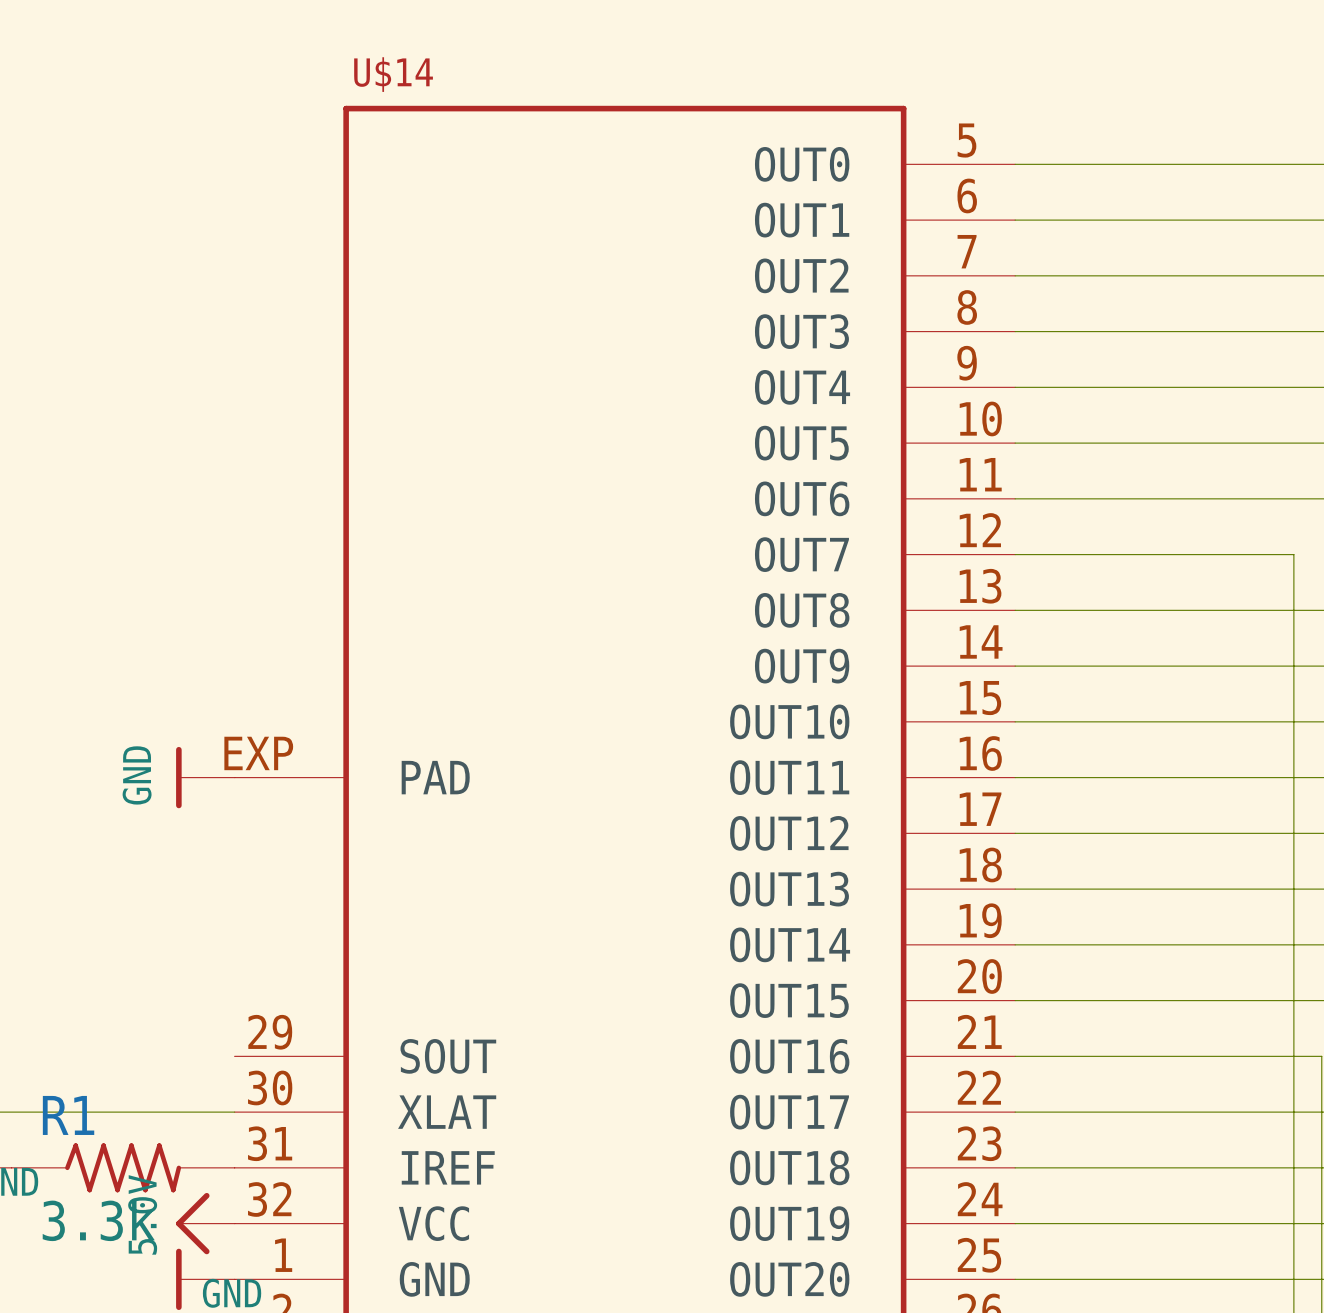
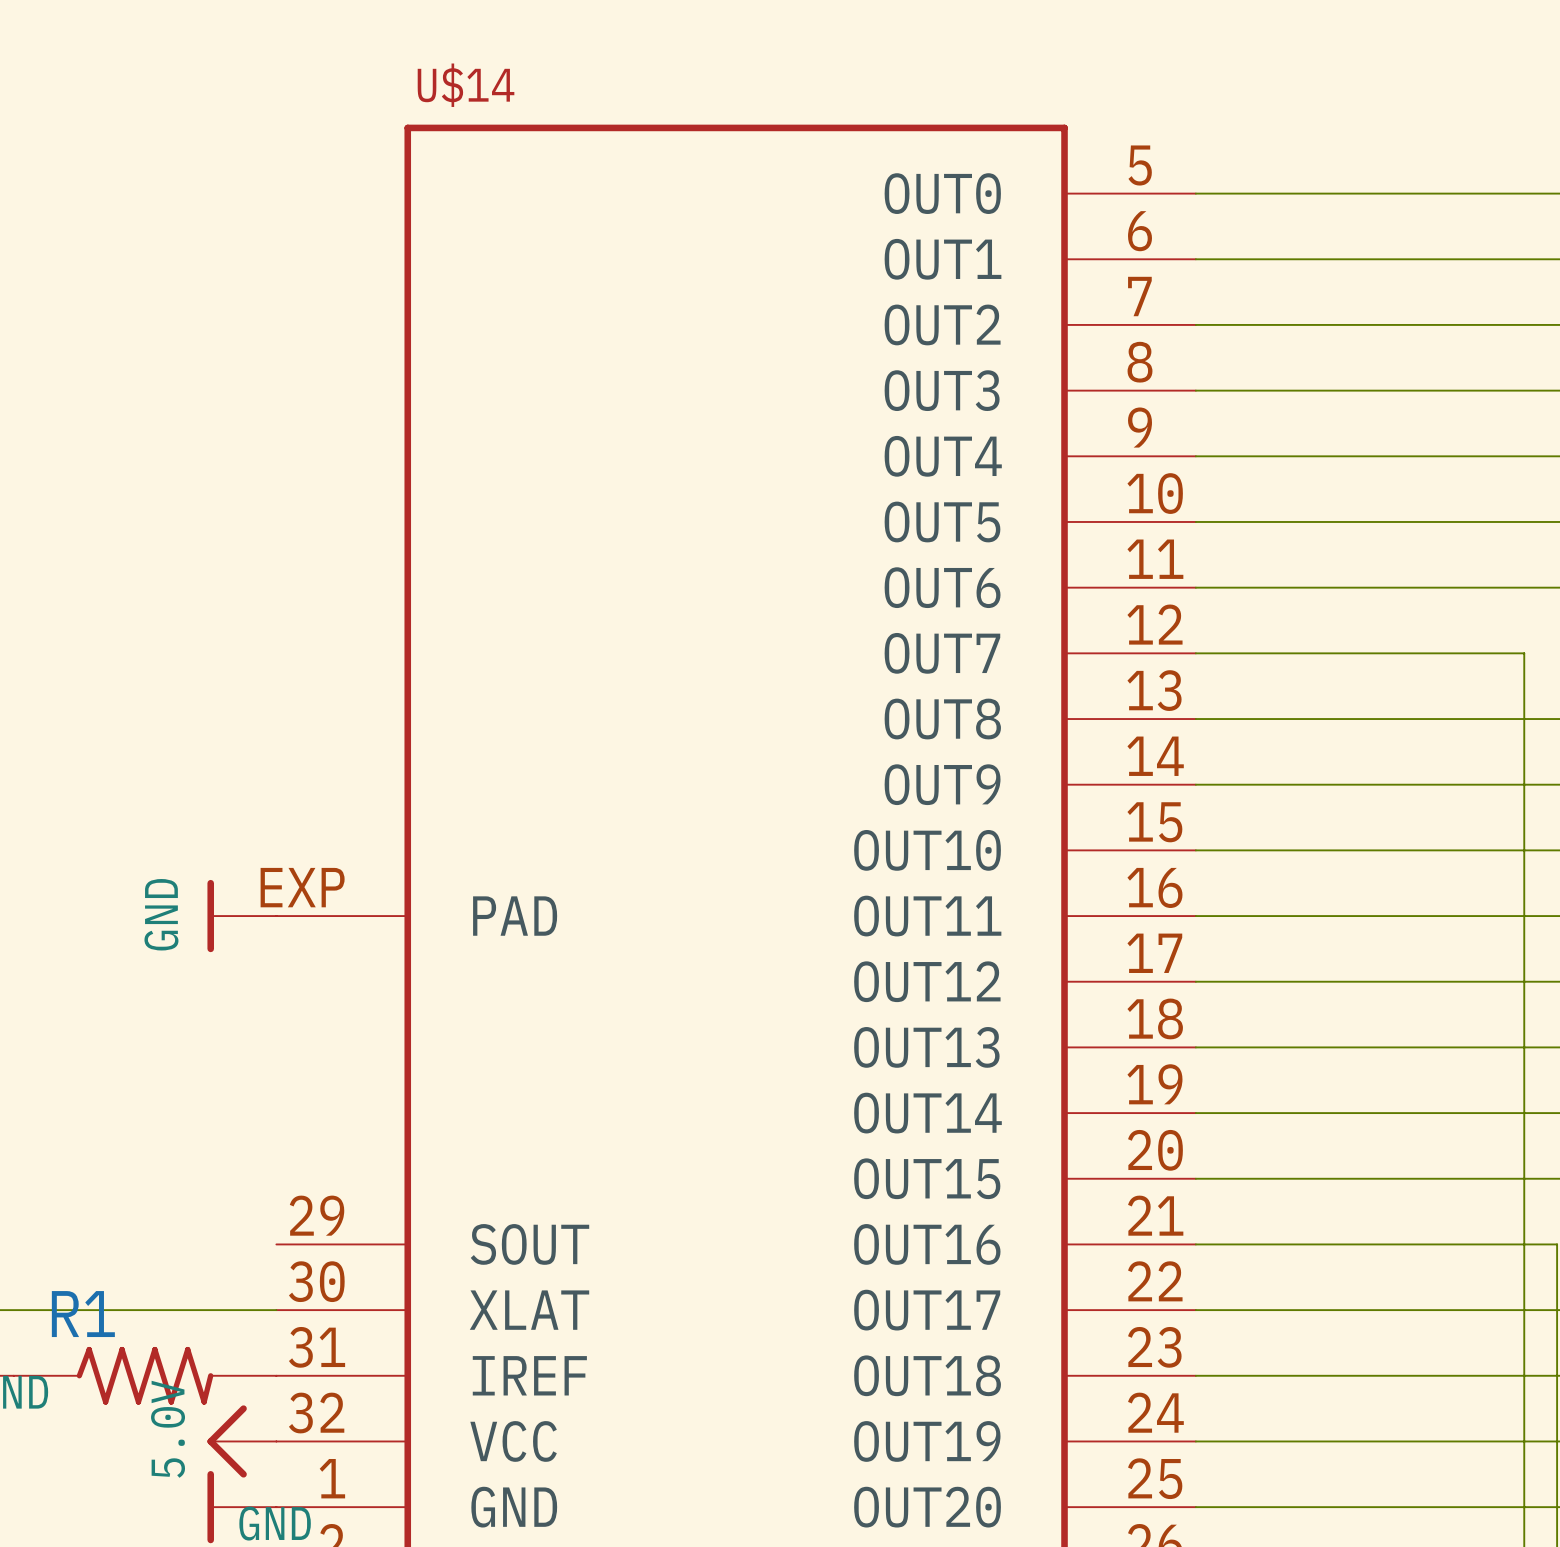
R1 value: 3.3k (98, 1220) -> none

